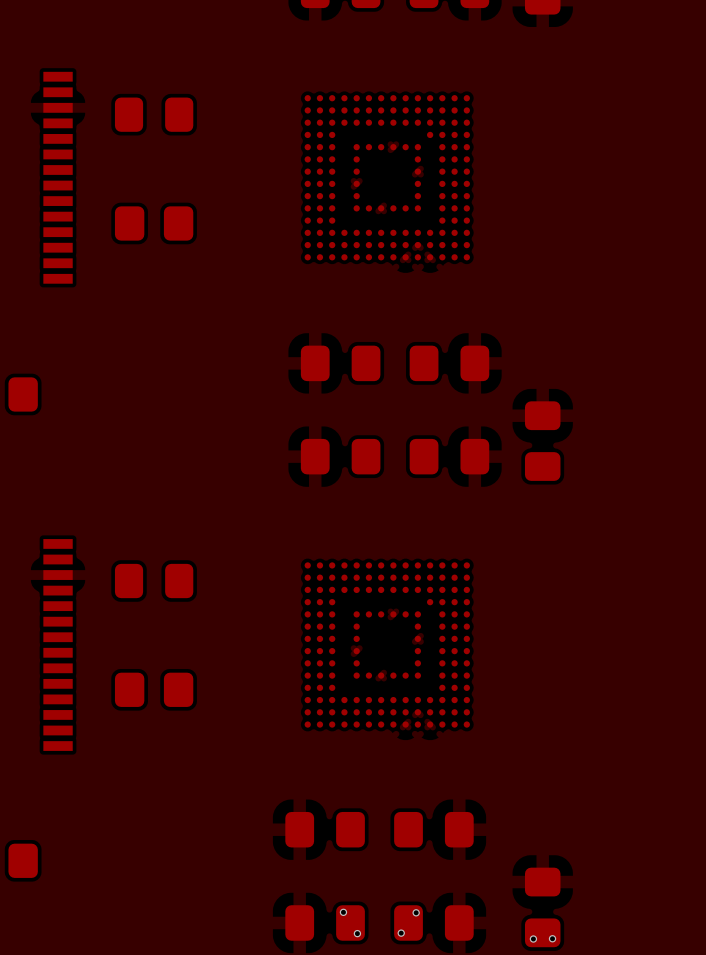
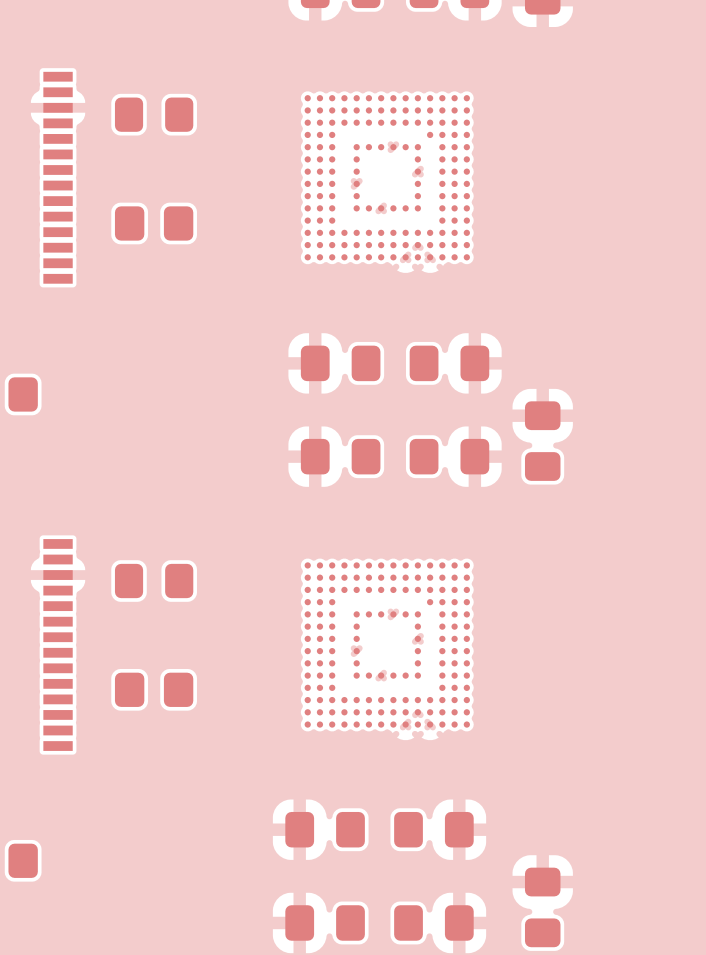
via: (343, 912) -> none
via: (416, 912) -> none
via: (357, 933) -> none
via: (401, 933) -> none
via: (552, 938) -> none
via: (533, 939) -> none

